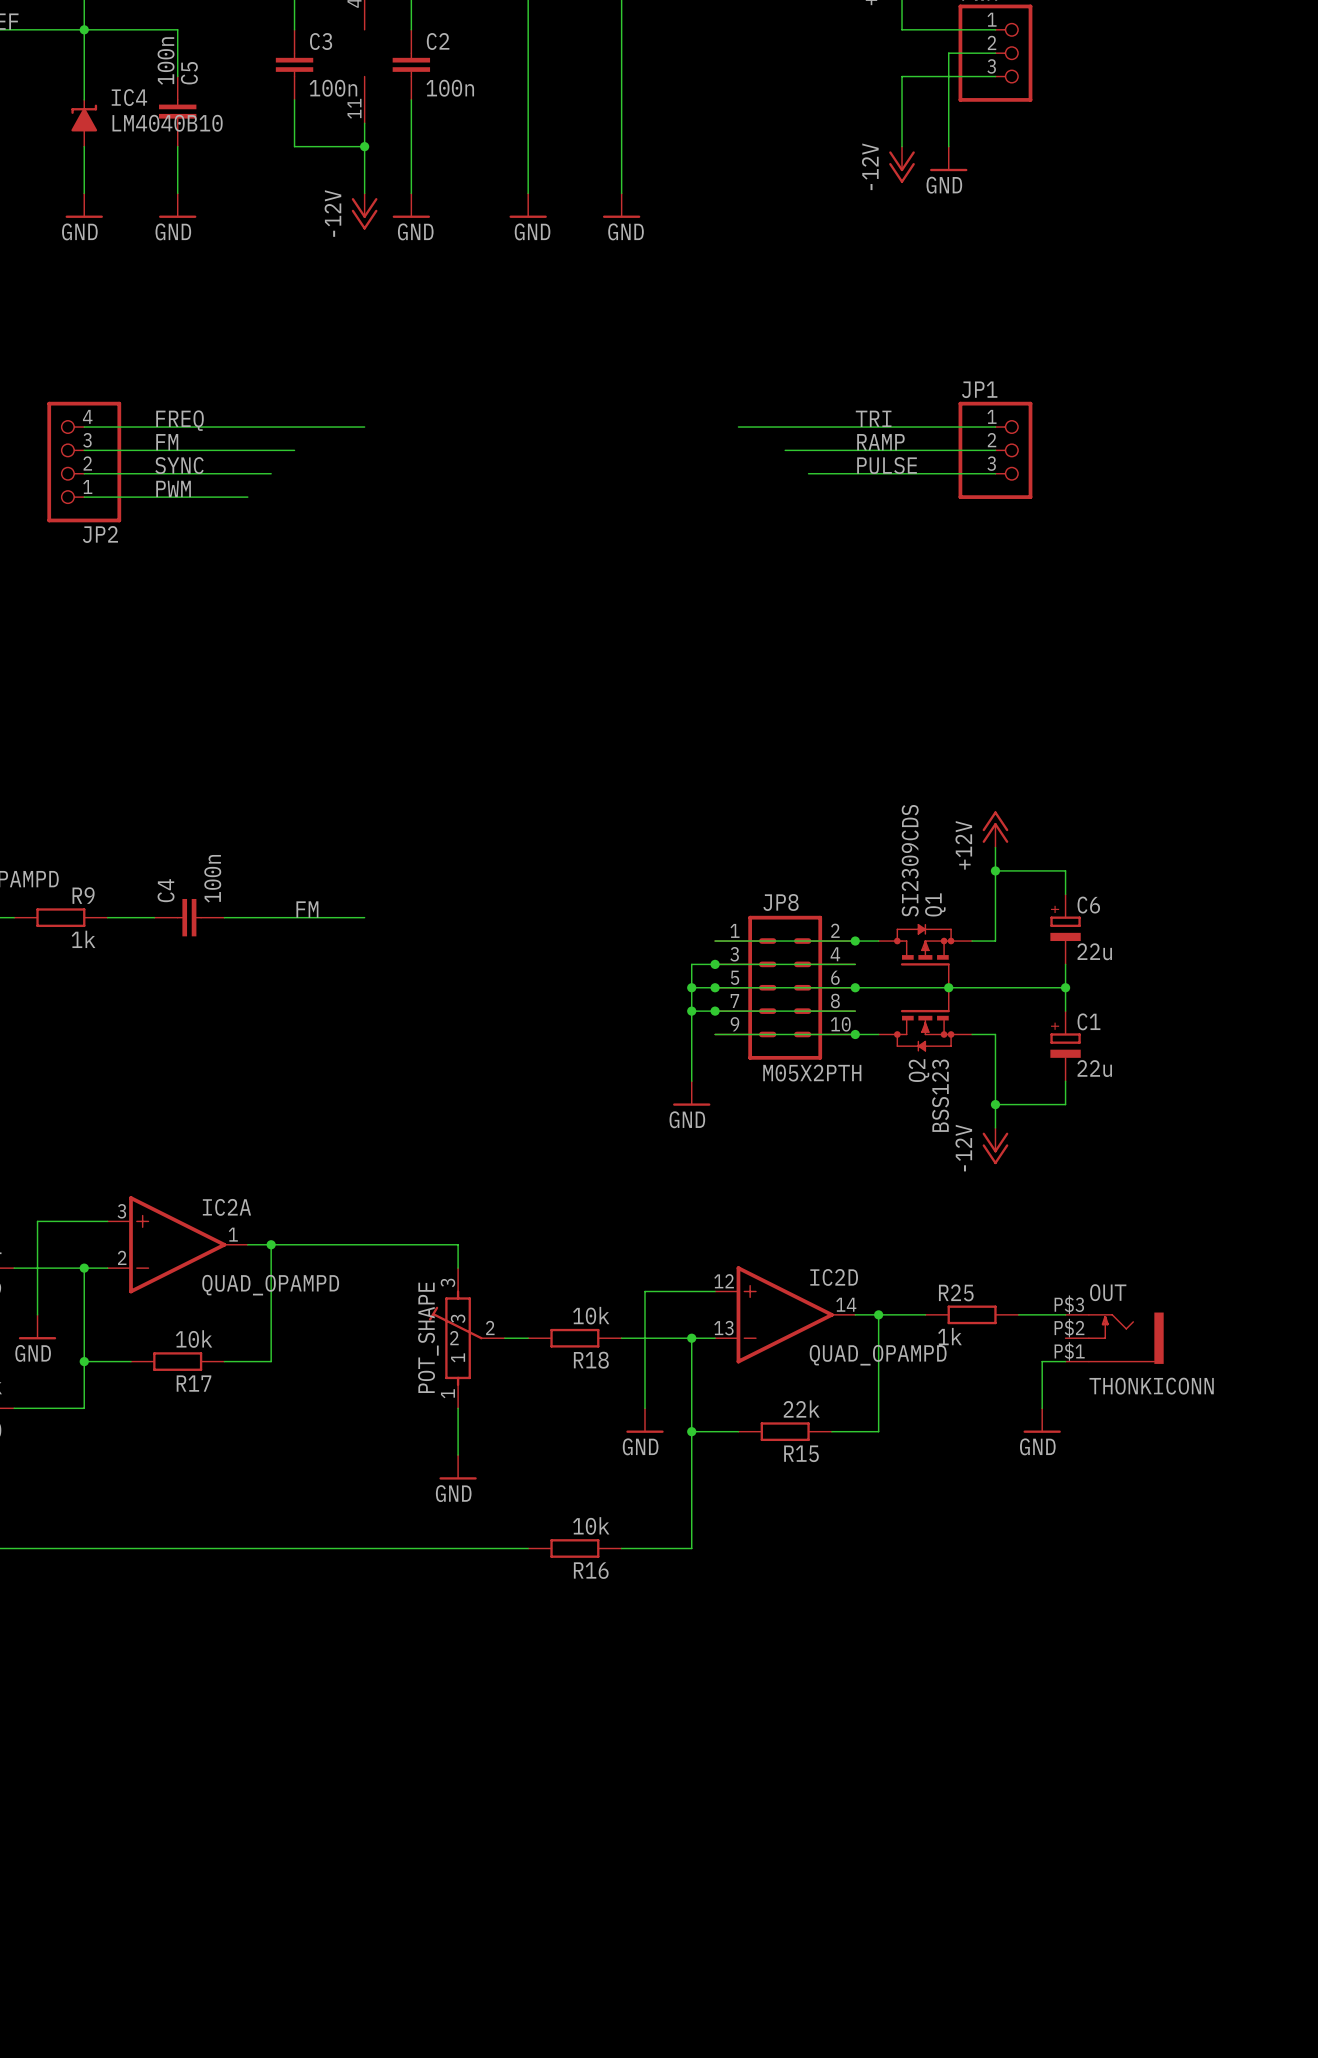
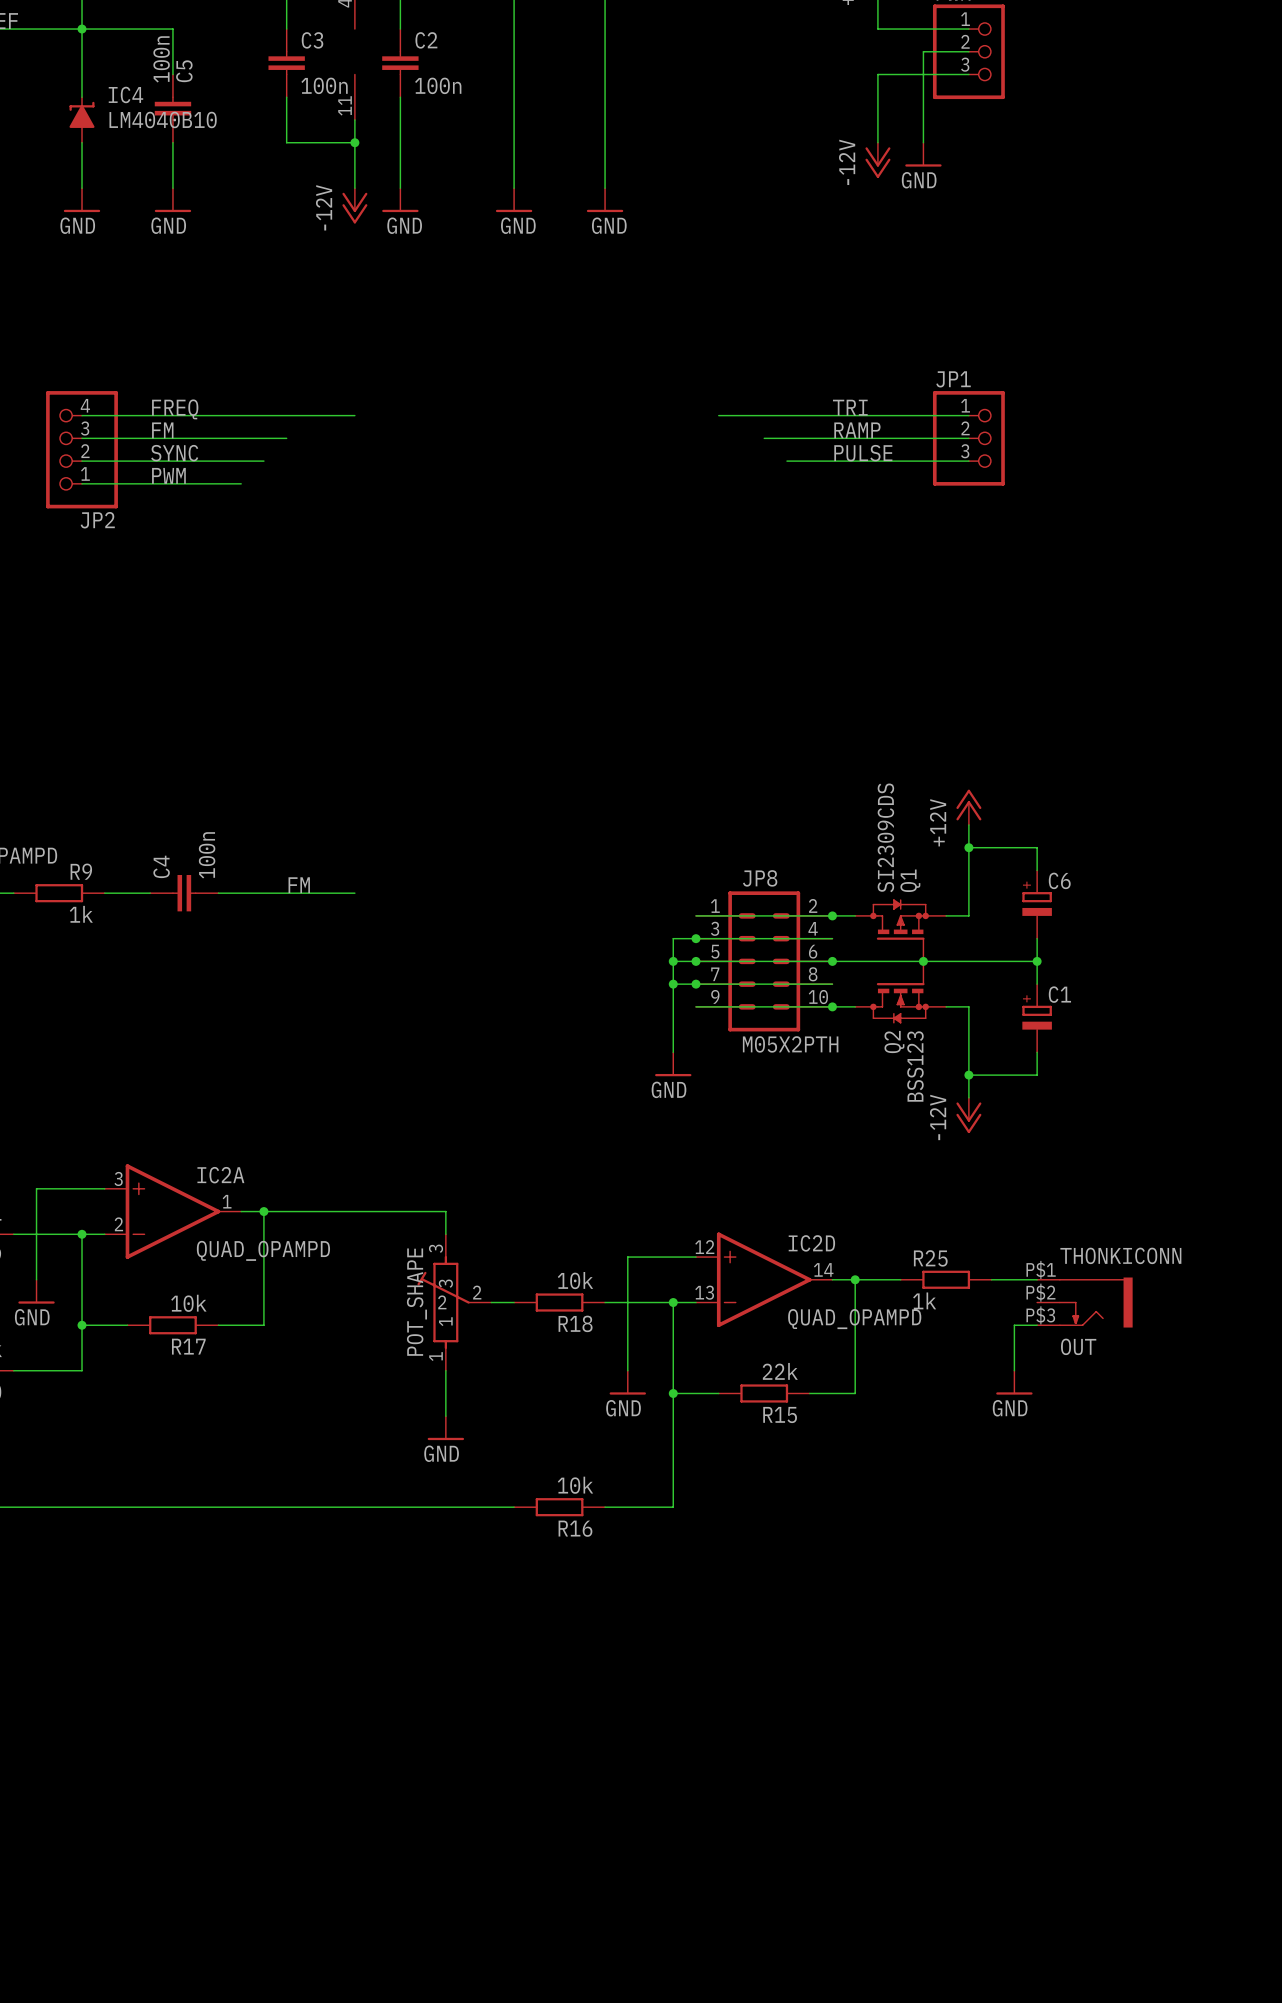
C6 value: 22u (1094, 951) -> none
C1 value: 22u (1094, 1068) -> none
OUT flip: as is (1125, 1338) -> up-down (1095, 1302)

